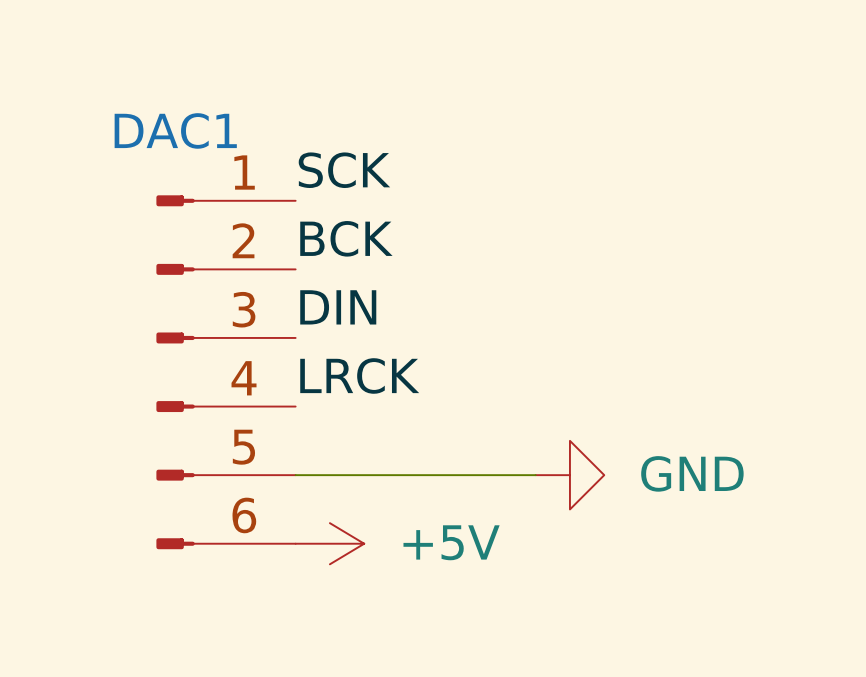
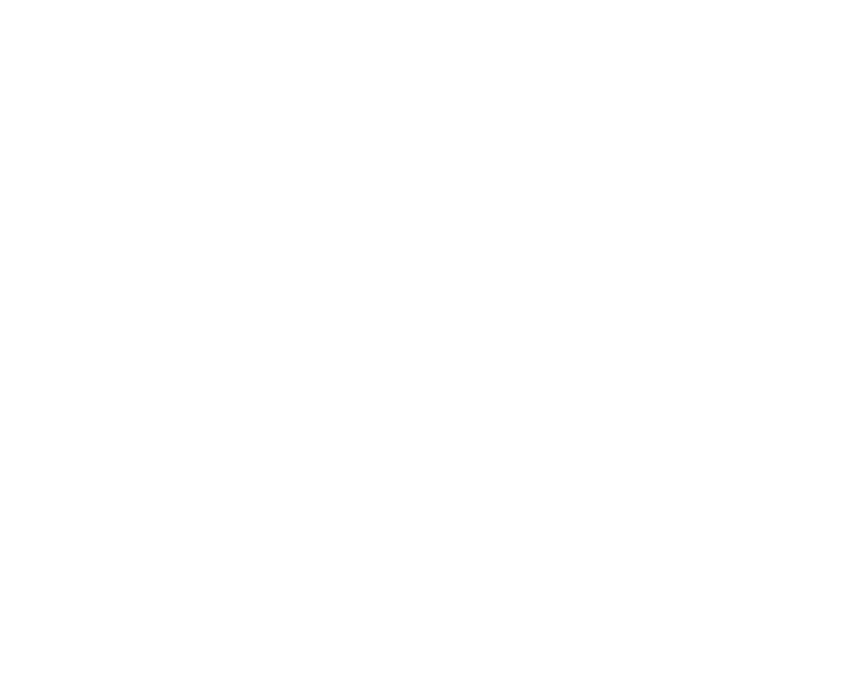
label: SCK (344, 170) -> none
label: BCK (346, 238) -> none
label: DIN (338, 307) -> none
DAC1: (226, 372) -> none
label: LRCK (359, 375) -> none
wire: (295, 475) (535, 475) -> none
power symbol: GND (569, 475) -> none
power symbol: +5V (329, 543) -> none

